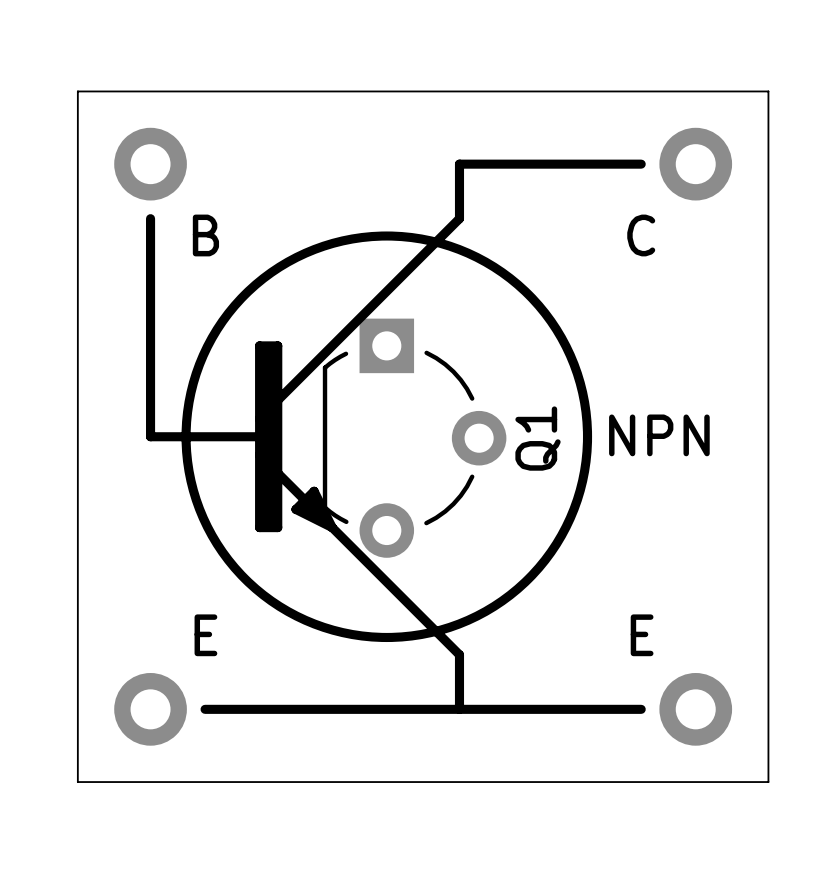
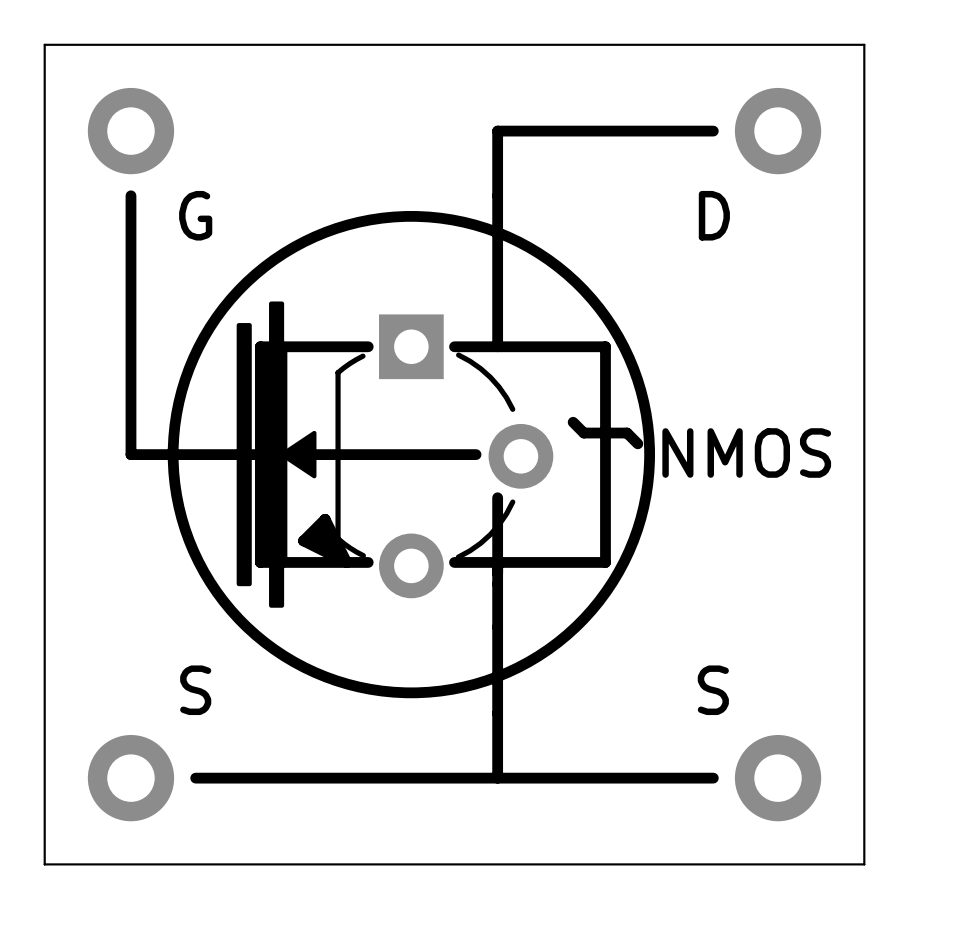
line: (459, 218) (259, 418) -> (497, 195) (497, 346)
part value: B (205, 235) -> G (195, 215)
part value: C (641, 235) -> D (714, 215)
drawing: none -> [236, 301, 317, 608]
line: none -> (281, 346) (368, 346)
line: none -> (454, 346) (605, 346) (605, 562) (454, 562)
line: none -> (573, 422) (583, 433) (627, 433) (637, 443)
text: NPN (659, 435) -> NMOS (746, 452)
line: none -> (281, 454) (476, 454)
Q1 name: Q1 (538, 438) -> none
line: (259, 454) (459, 654) -> (497, 497) (497, 713)
line: none -> (281, 562) (368, 562)
part value: E (205, 635) -> S (195, 690)
part value: E (642, 635) -> S (713, 690)

